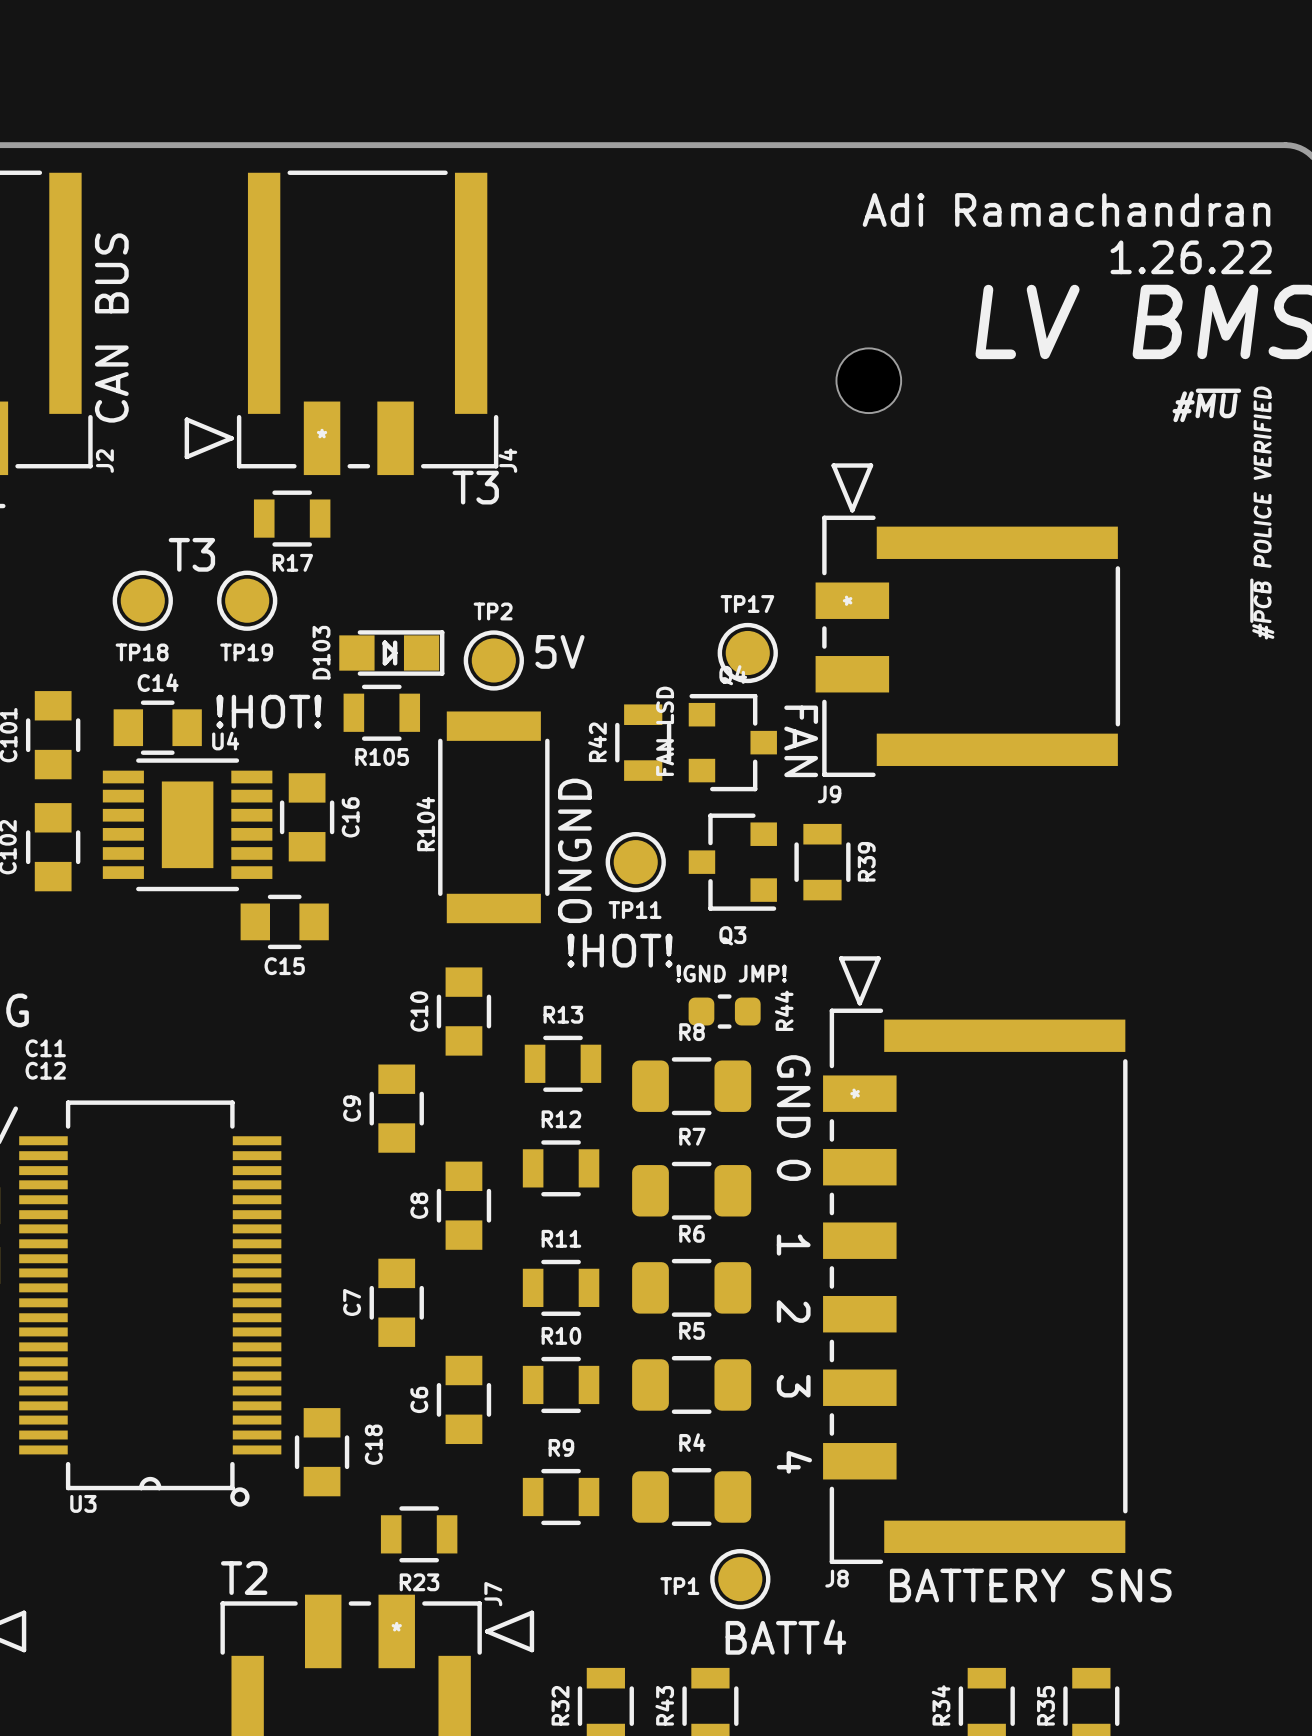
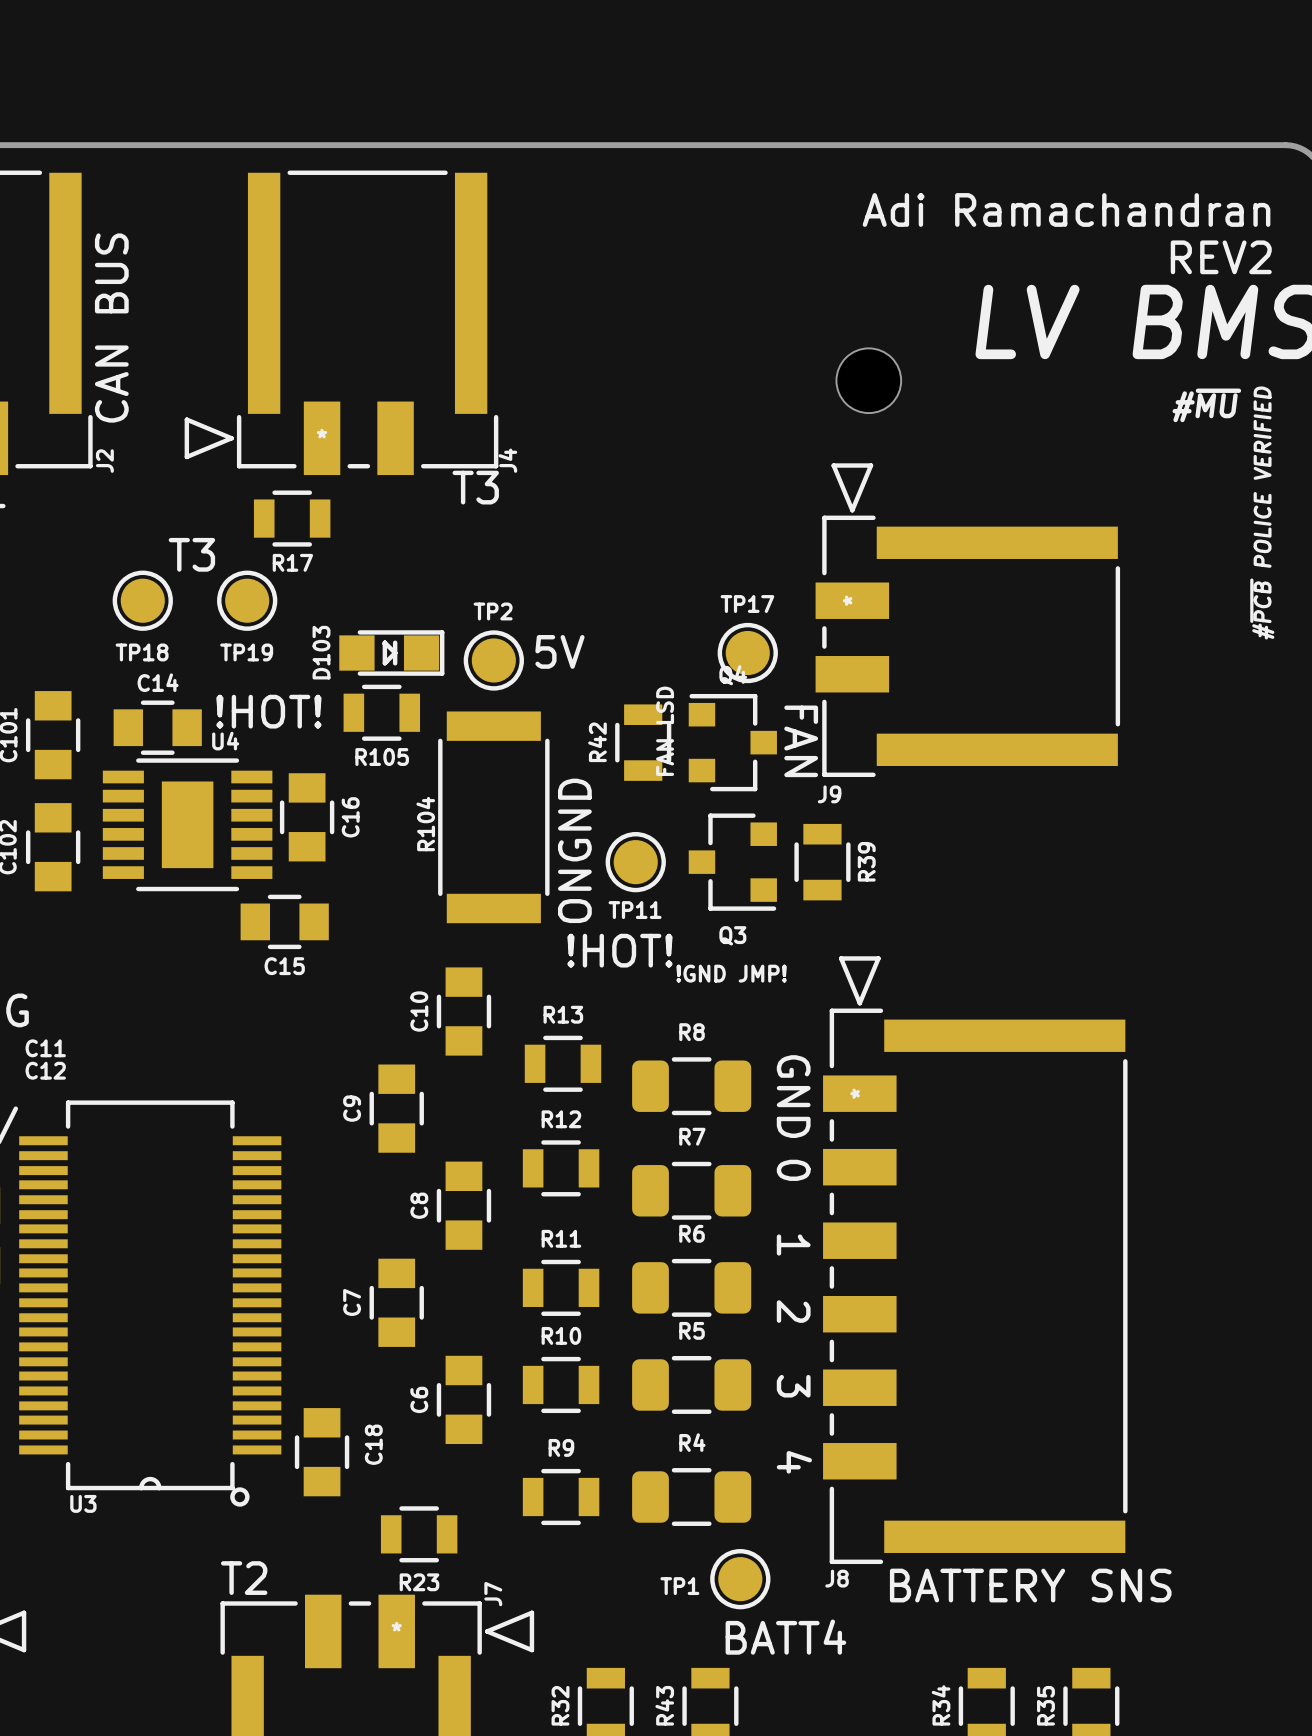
text: 1.26.22 (1191, 257) -> REV2 (1221, 257)
R44: (724, 1011) -> none

